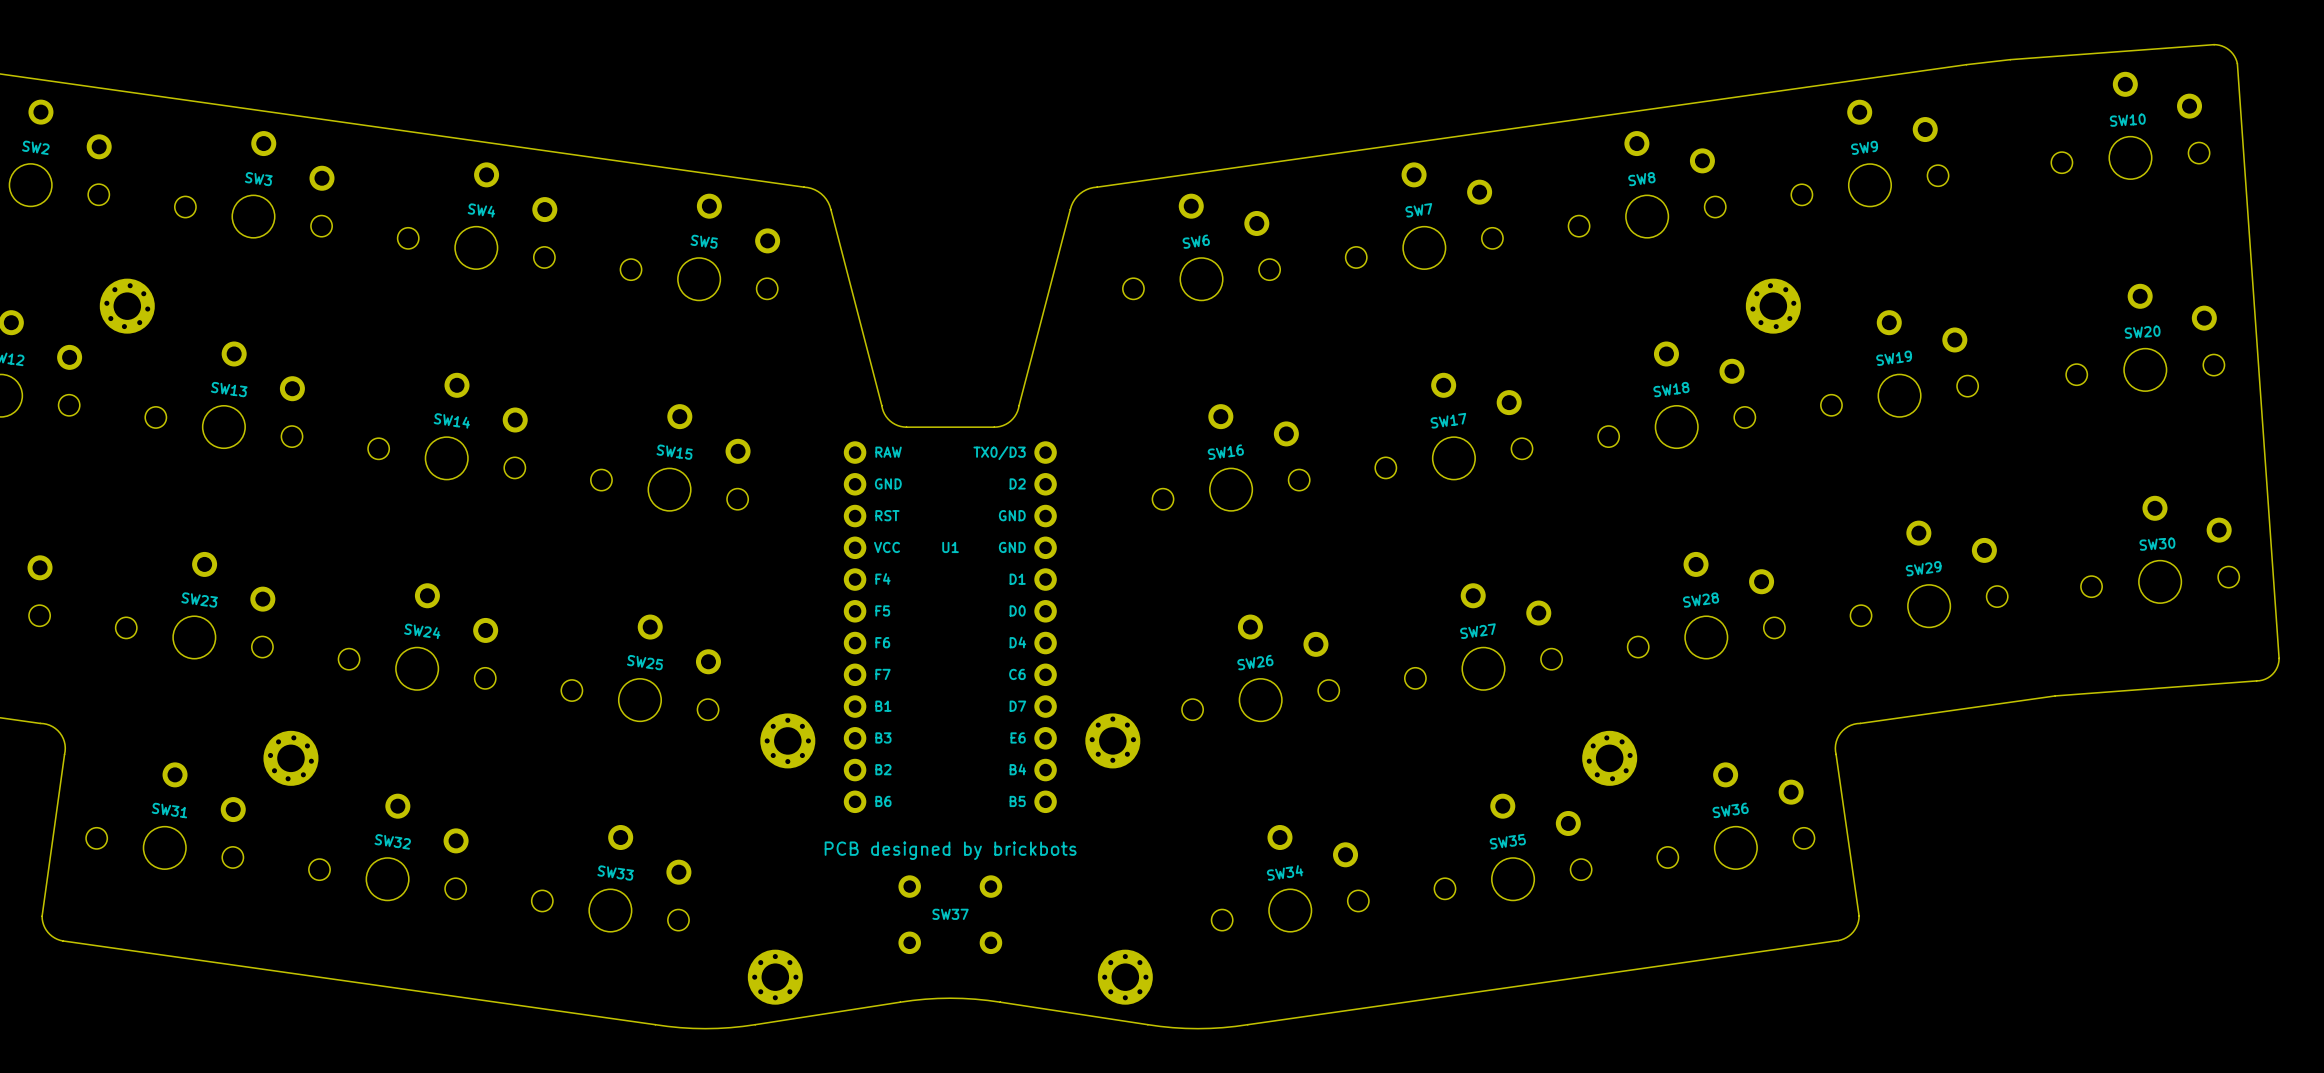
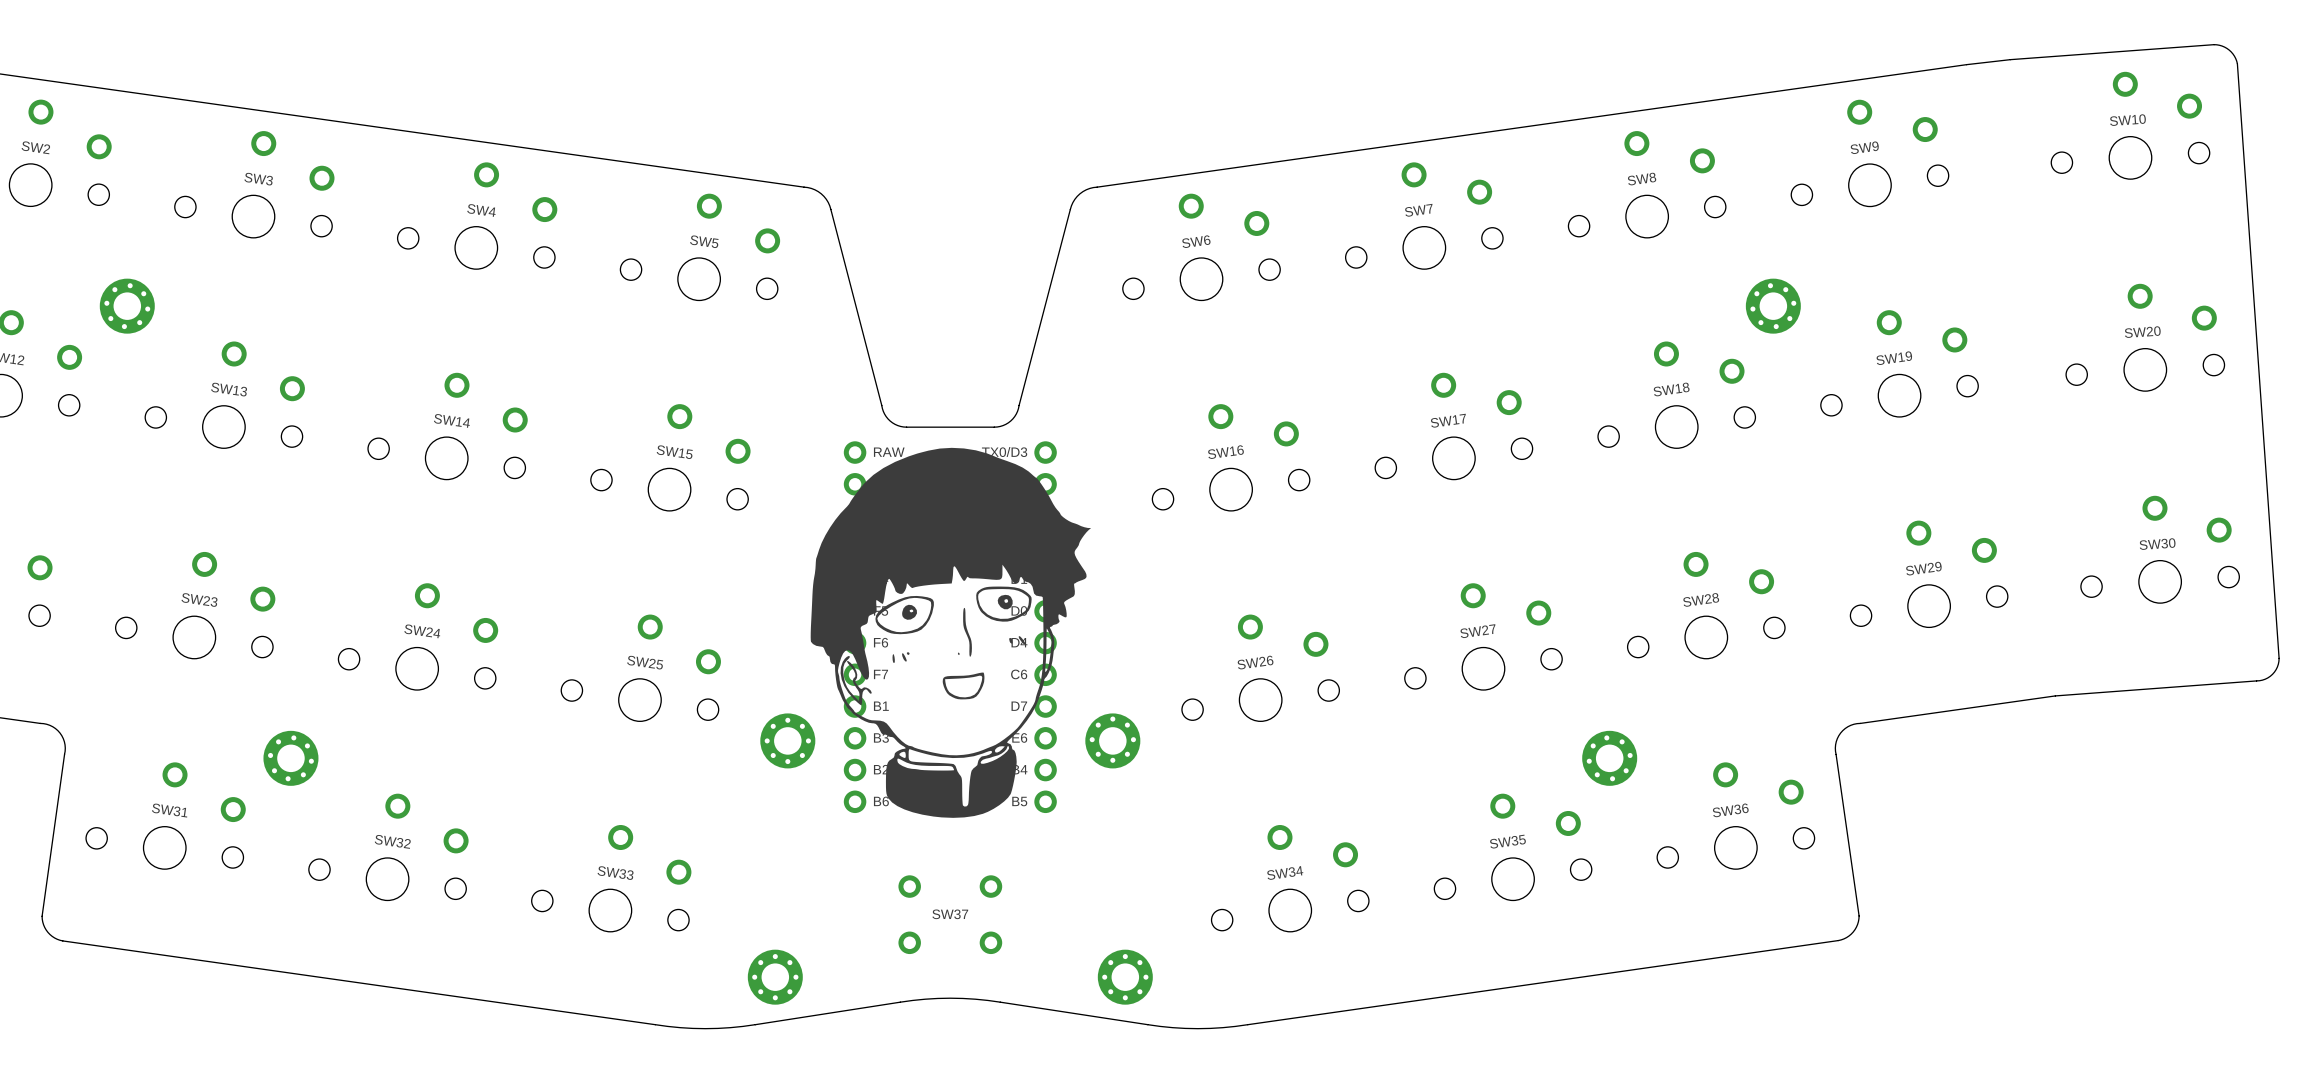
drawing: none -> [810, 447, 1092, 818]
text: PCB designed by brickbots (950, 850) -> none

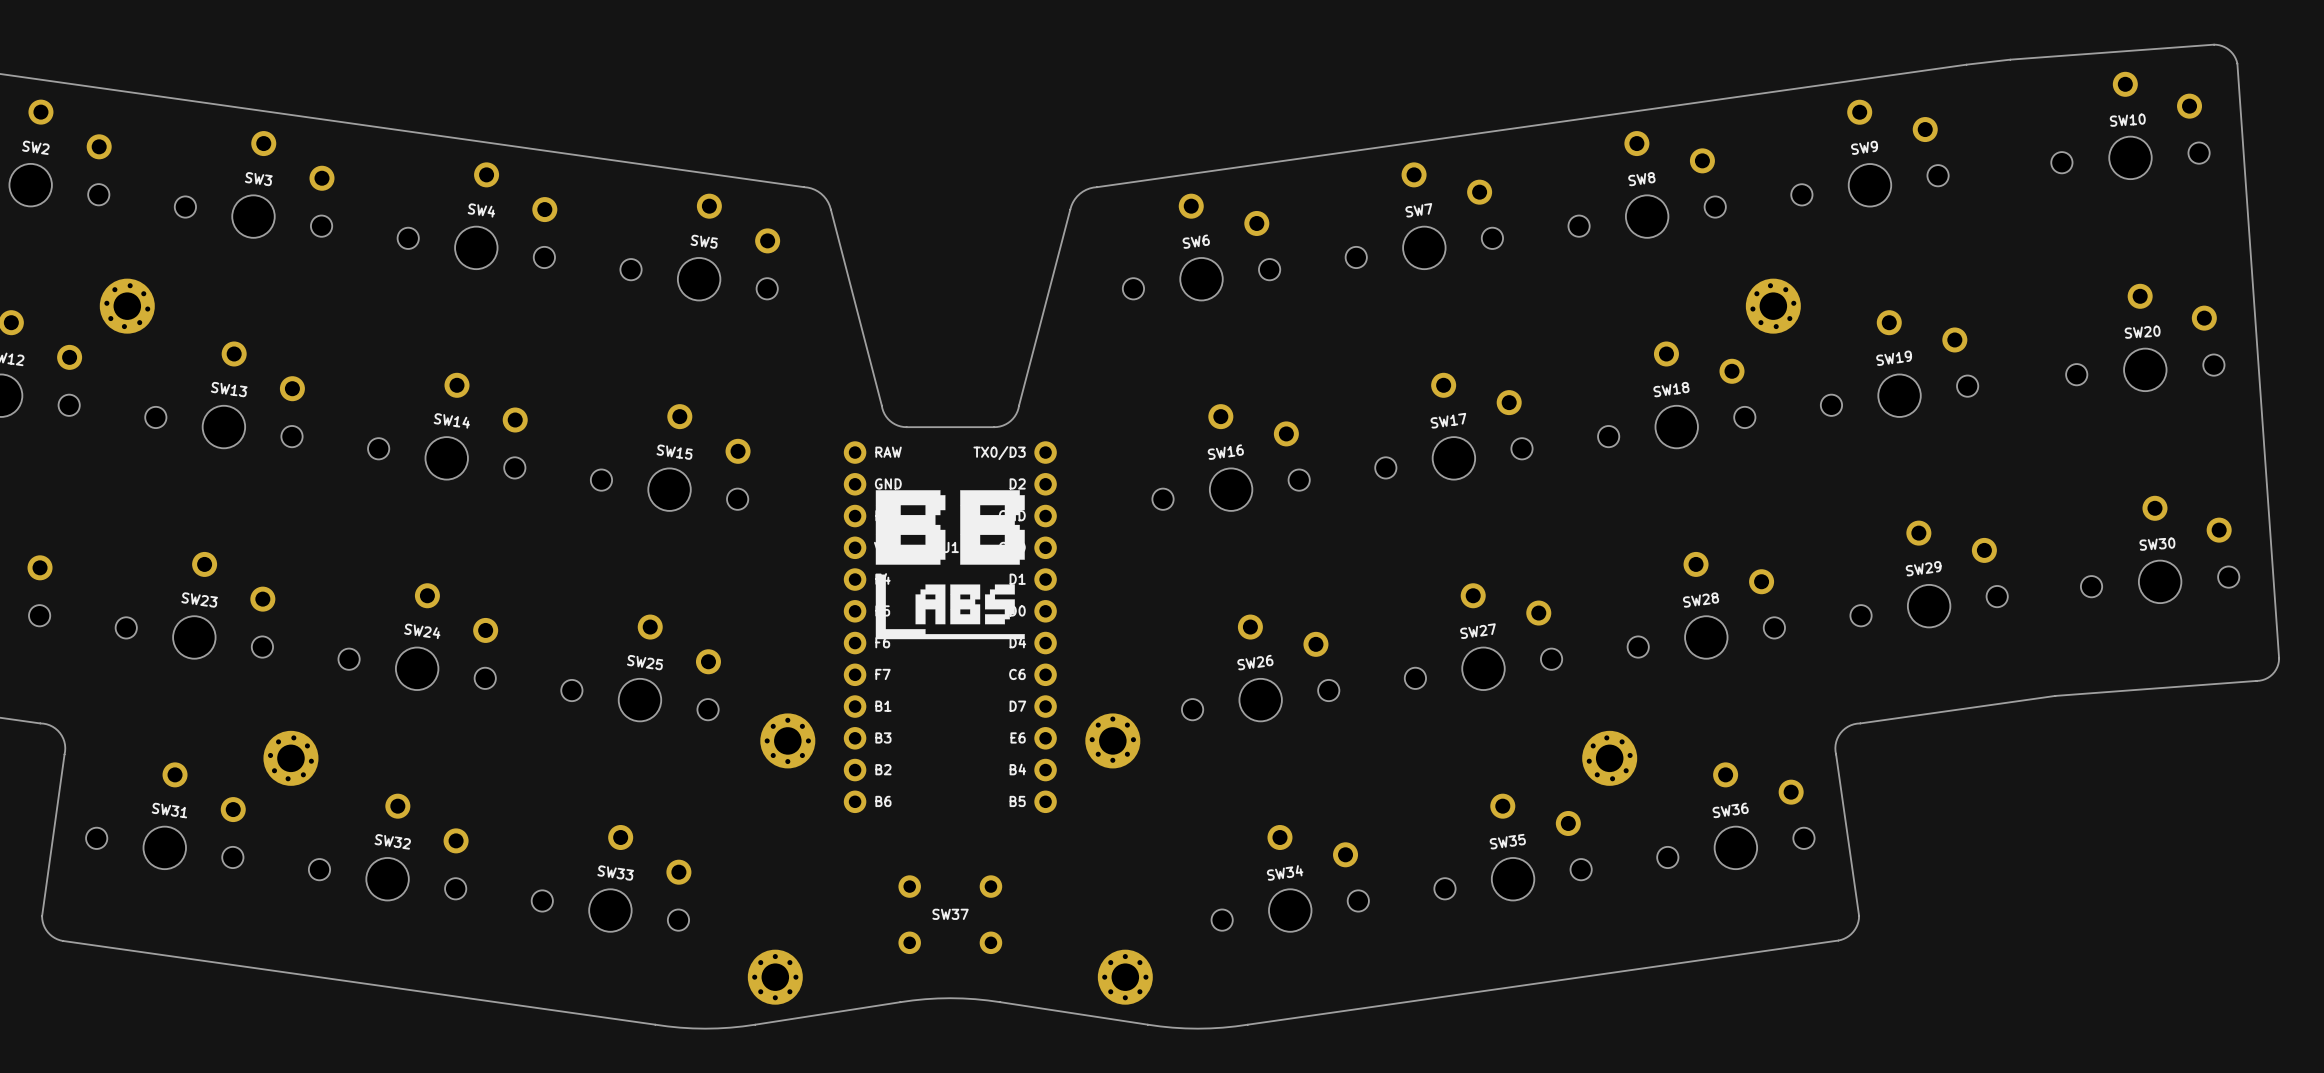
drawing: [810, 447, 1092, 818] -> none
drawing: none -> [875, 490, 1025, 640]

